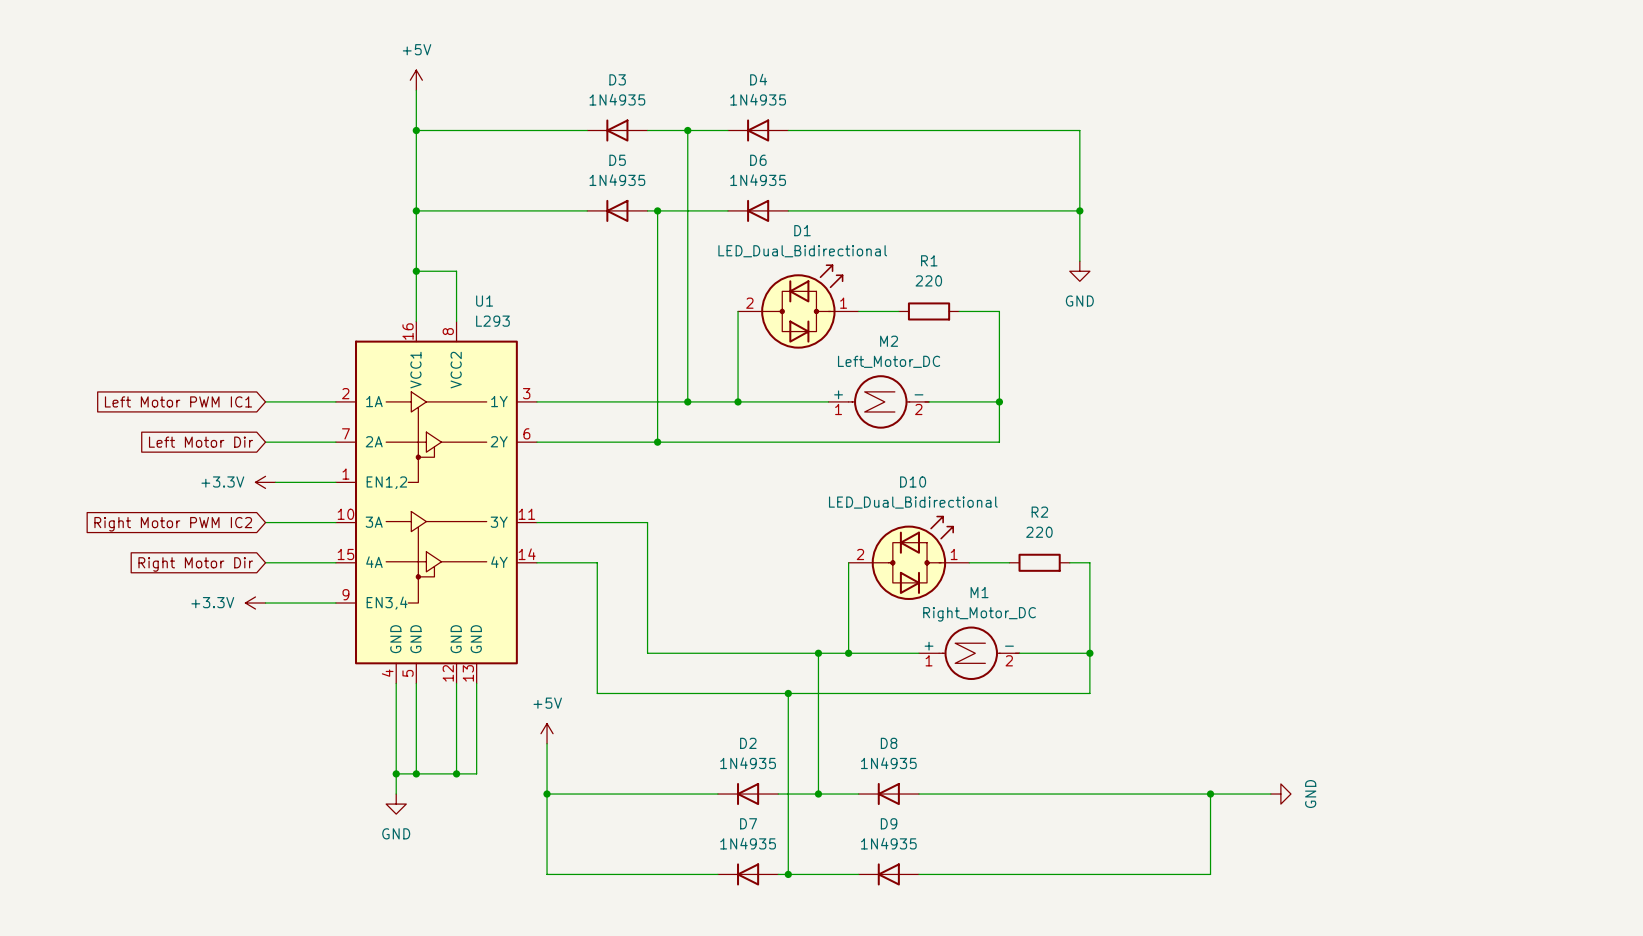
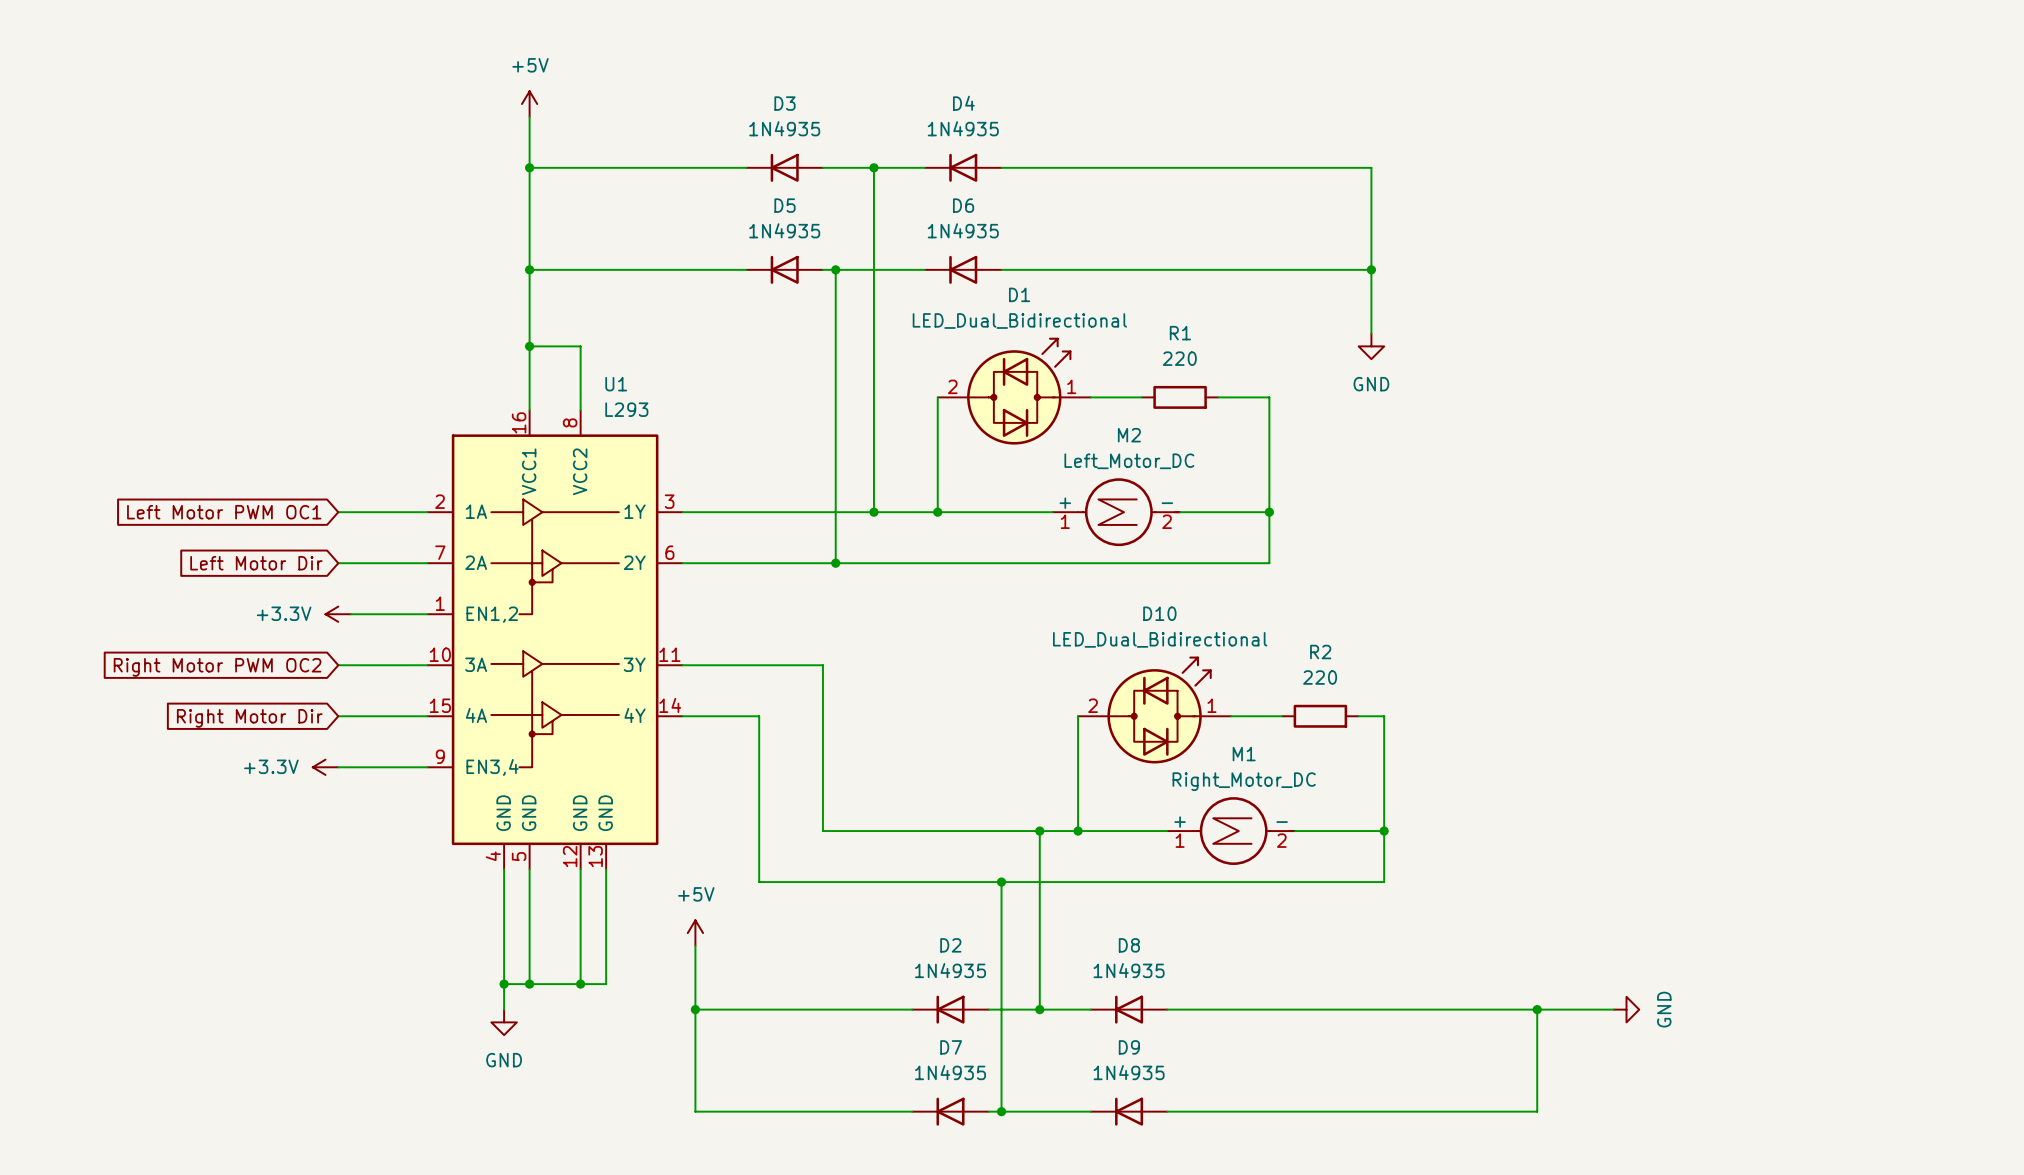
global label: Left Motor PWM IC1 (178, 401) -> Left Motor PWM OC1 (224, 512)
global label: Right Motor PWM IC2 (173, 524) -> Right Motor PWM OC2 (217, 667)

